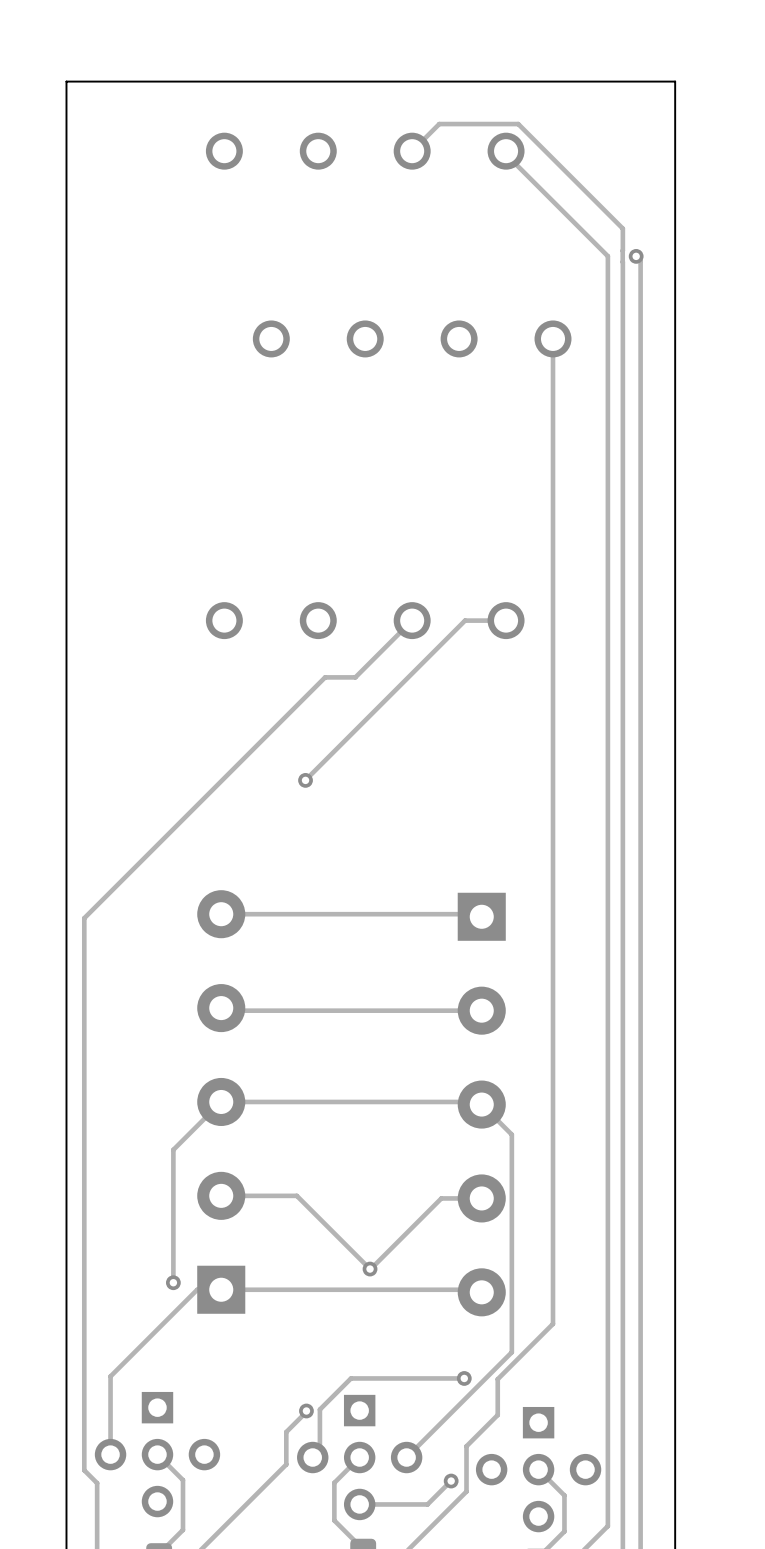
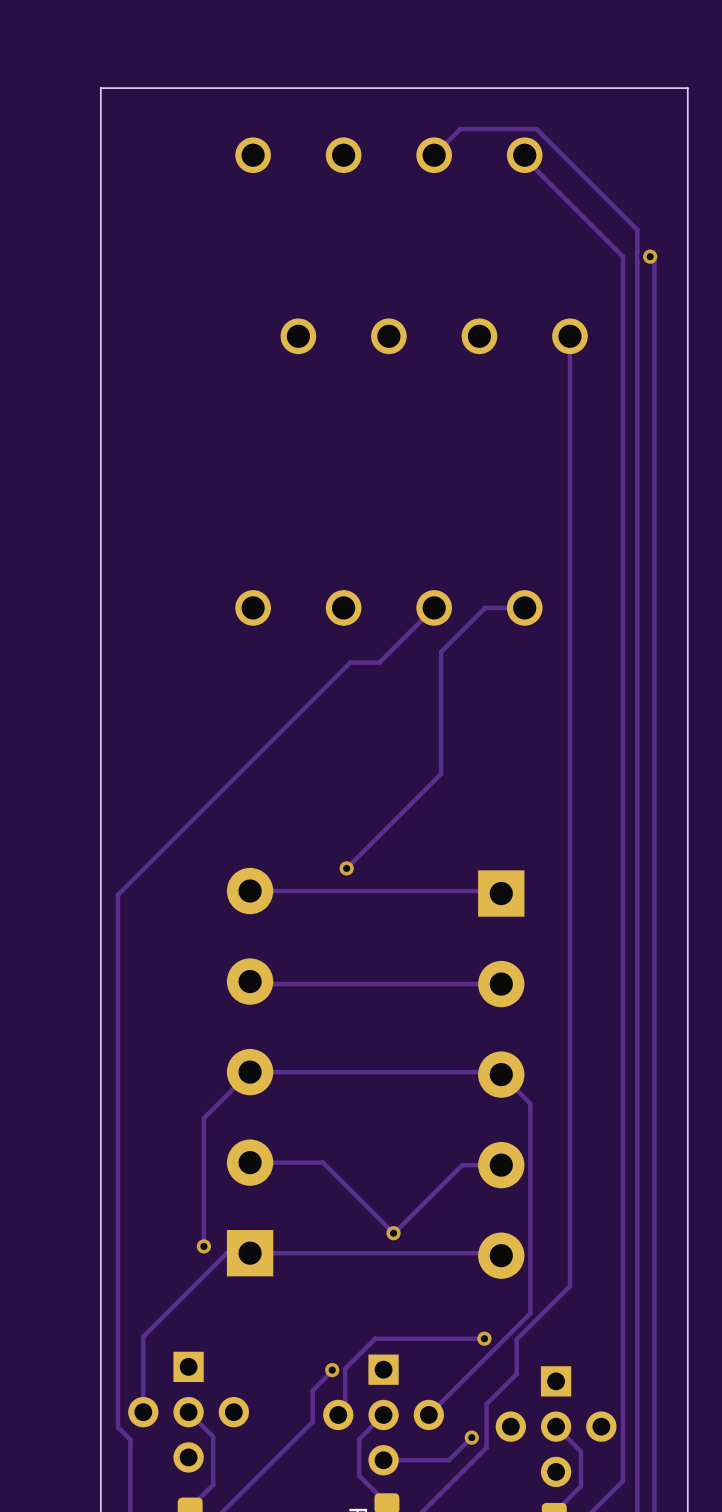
track: (419, 666) (305, 780) -> (441, 651) (441, 773) (346, 868)
via: (305, 780) -> none
via: none -> (346, 868)

